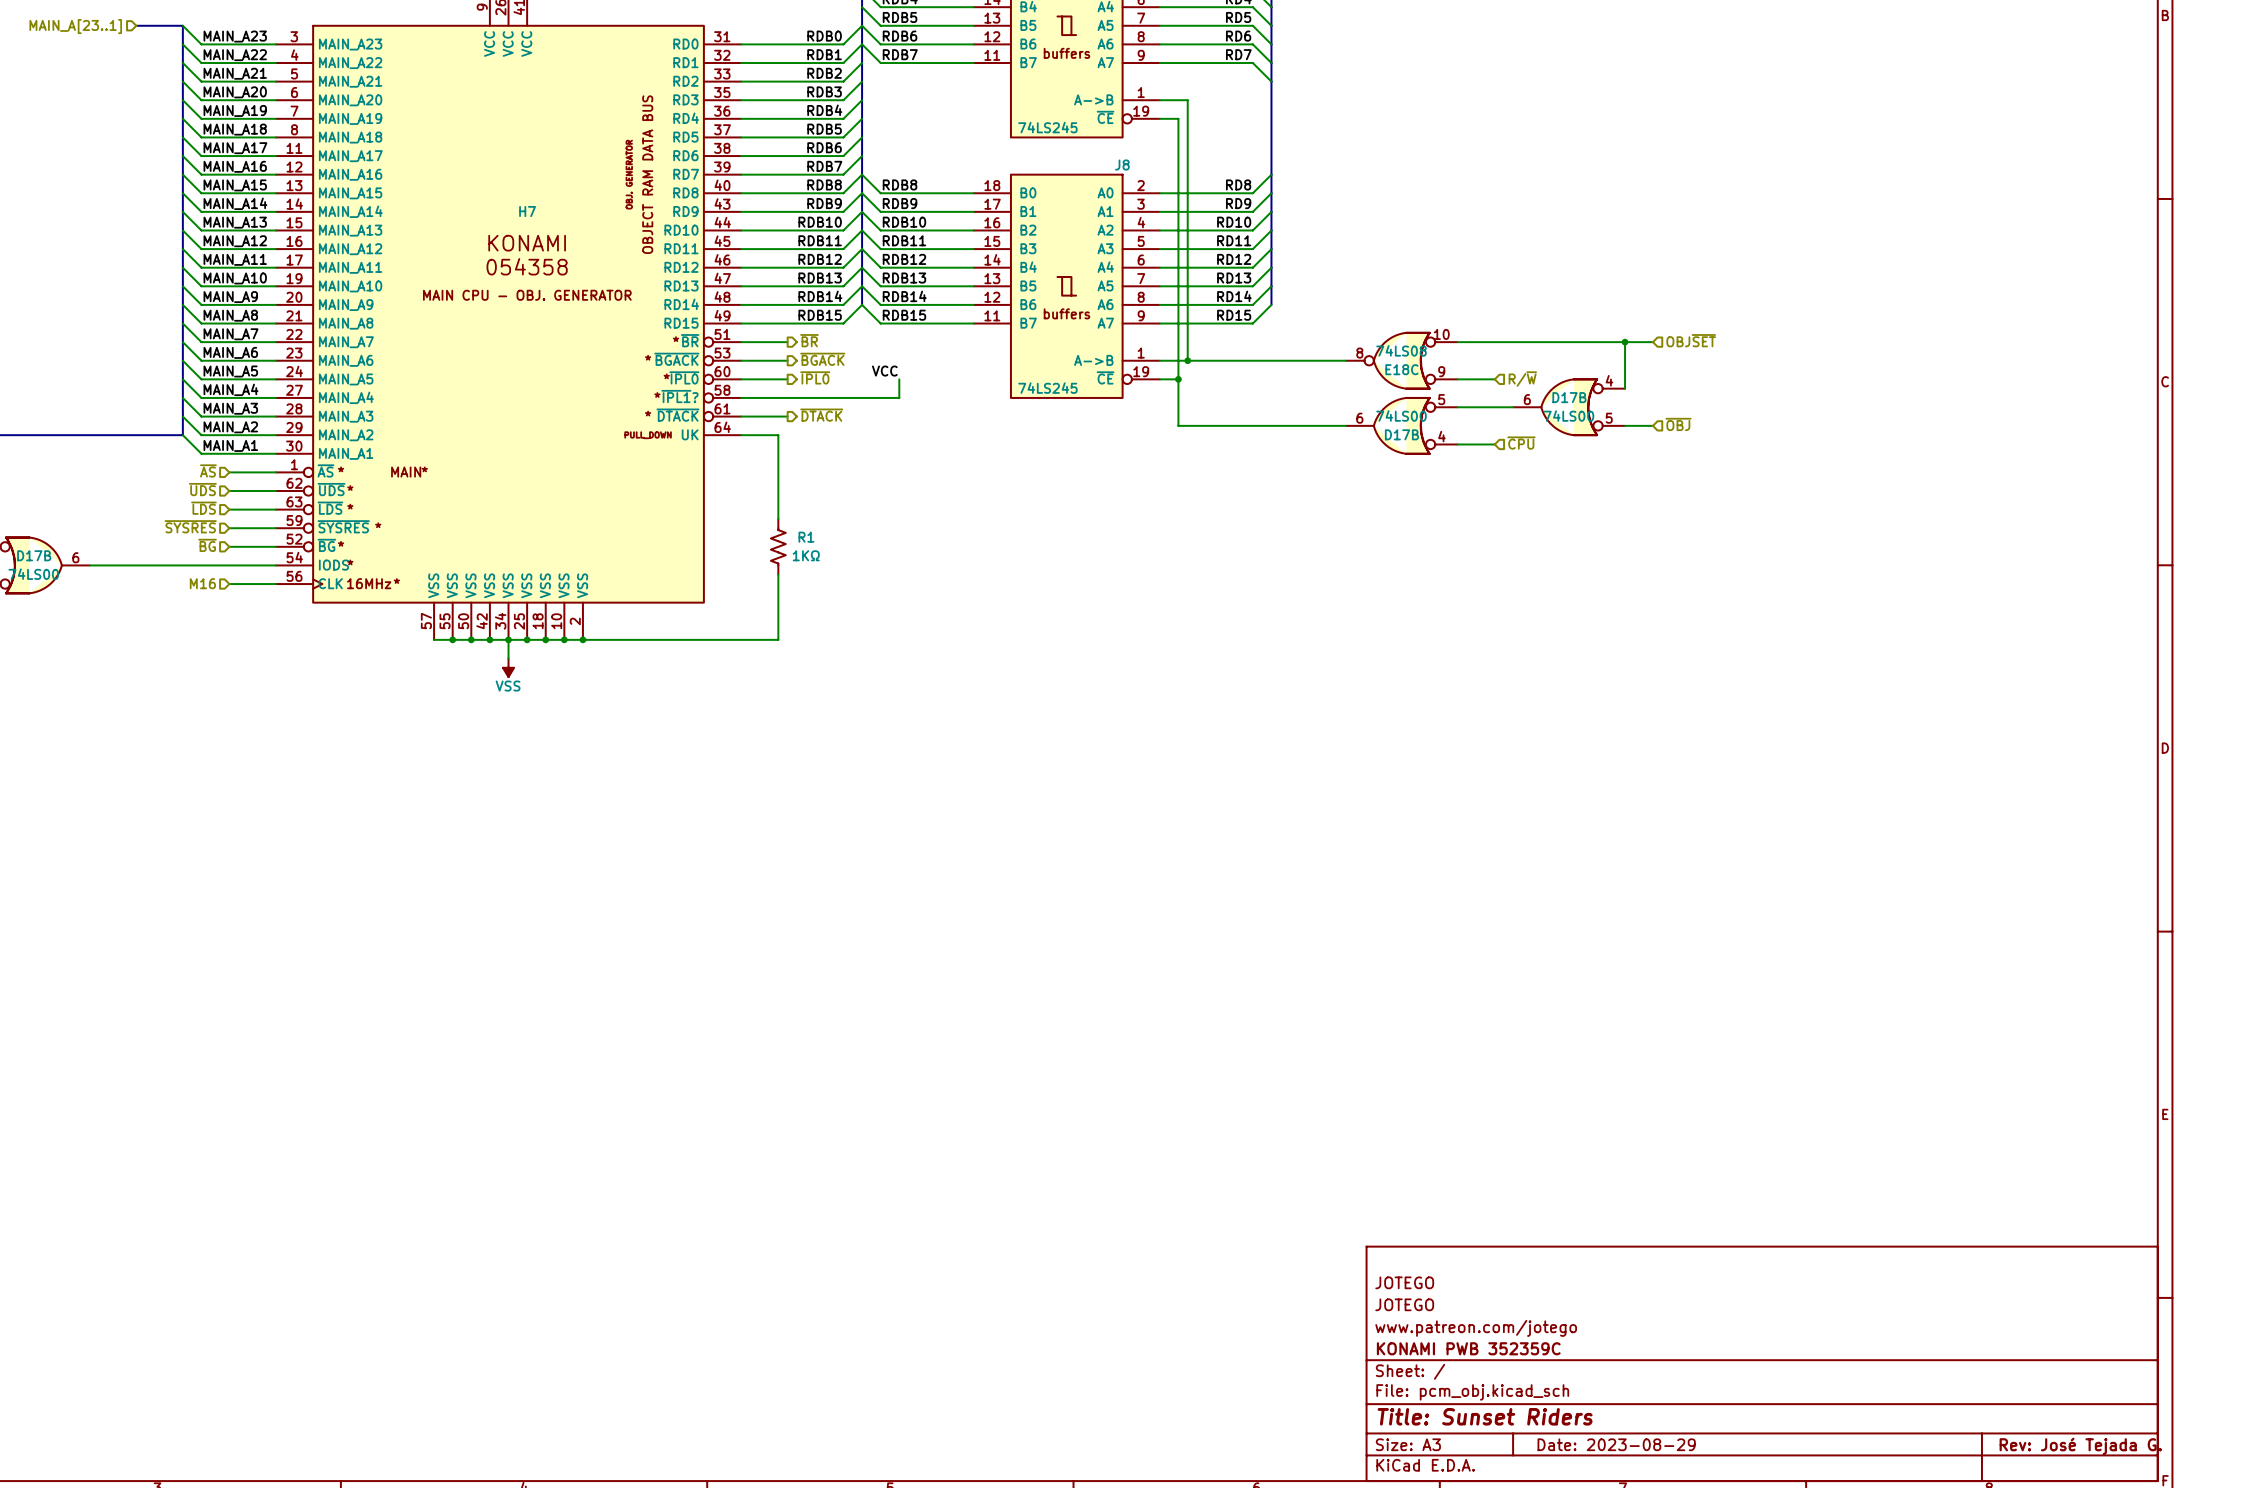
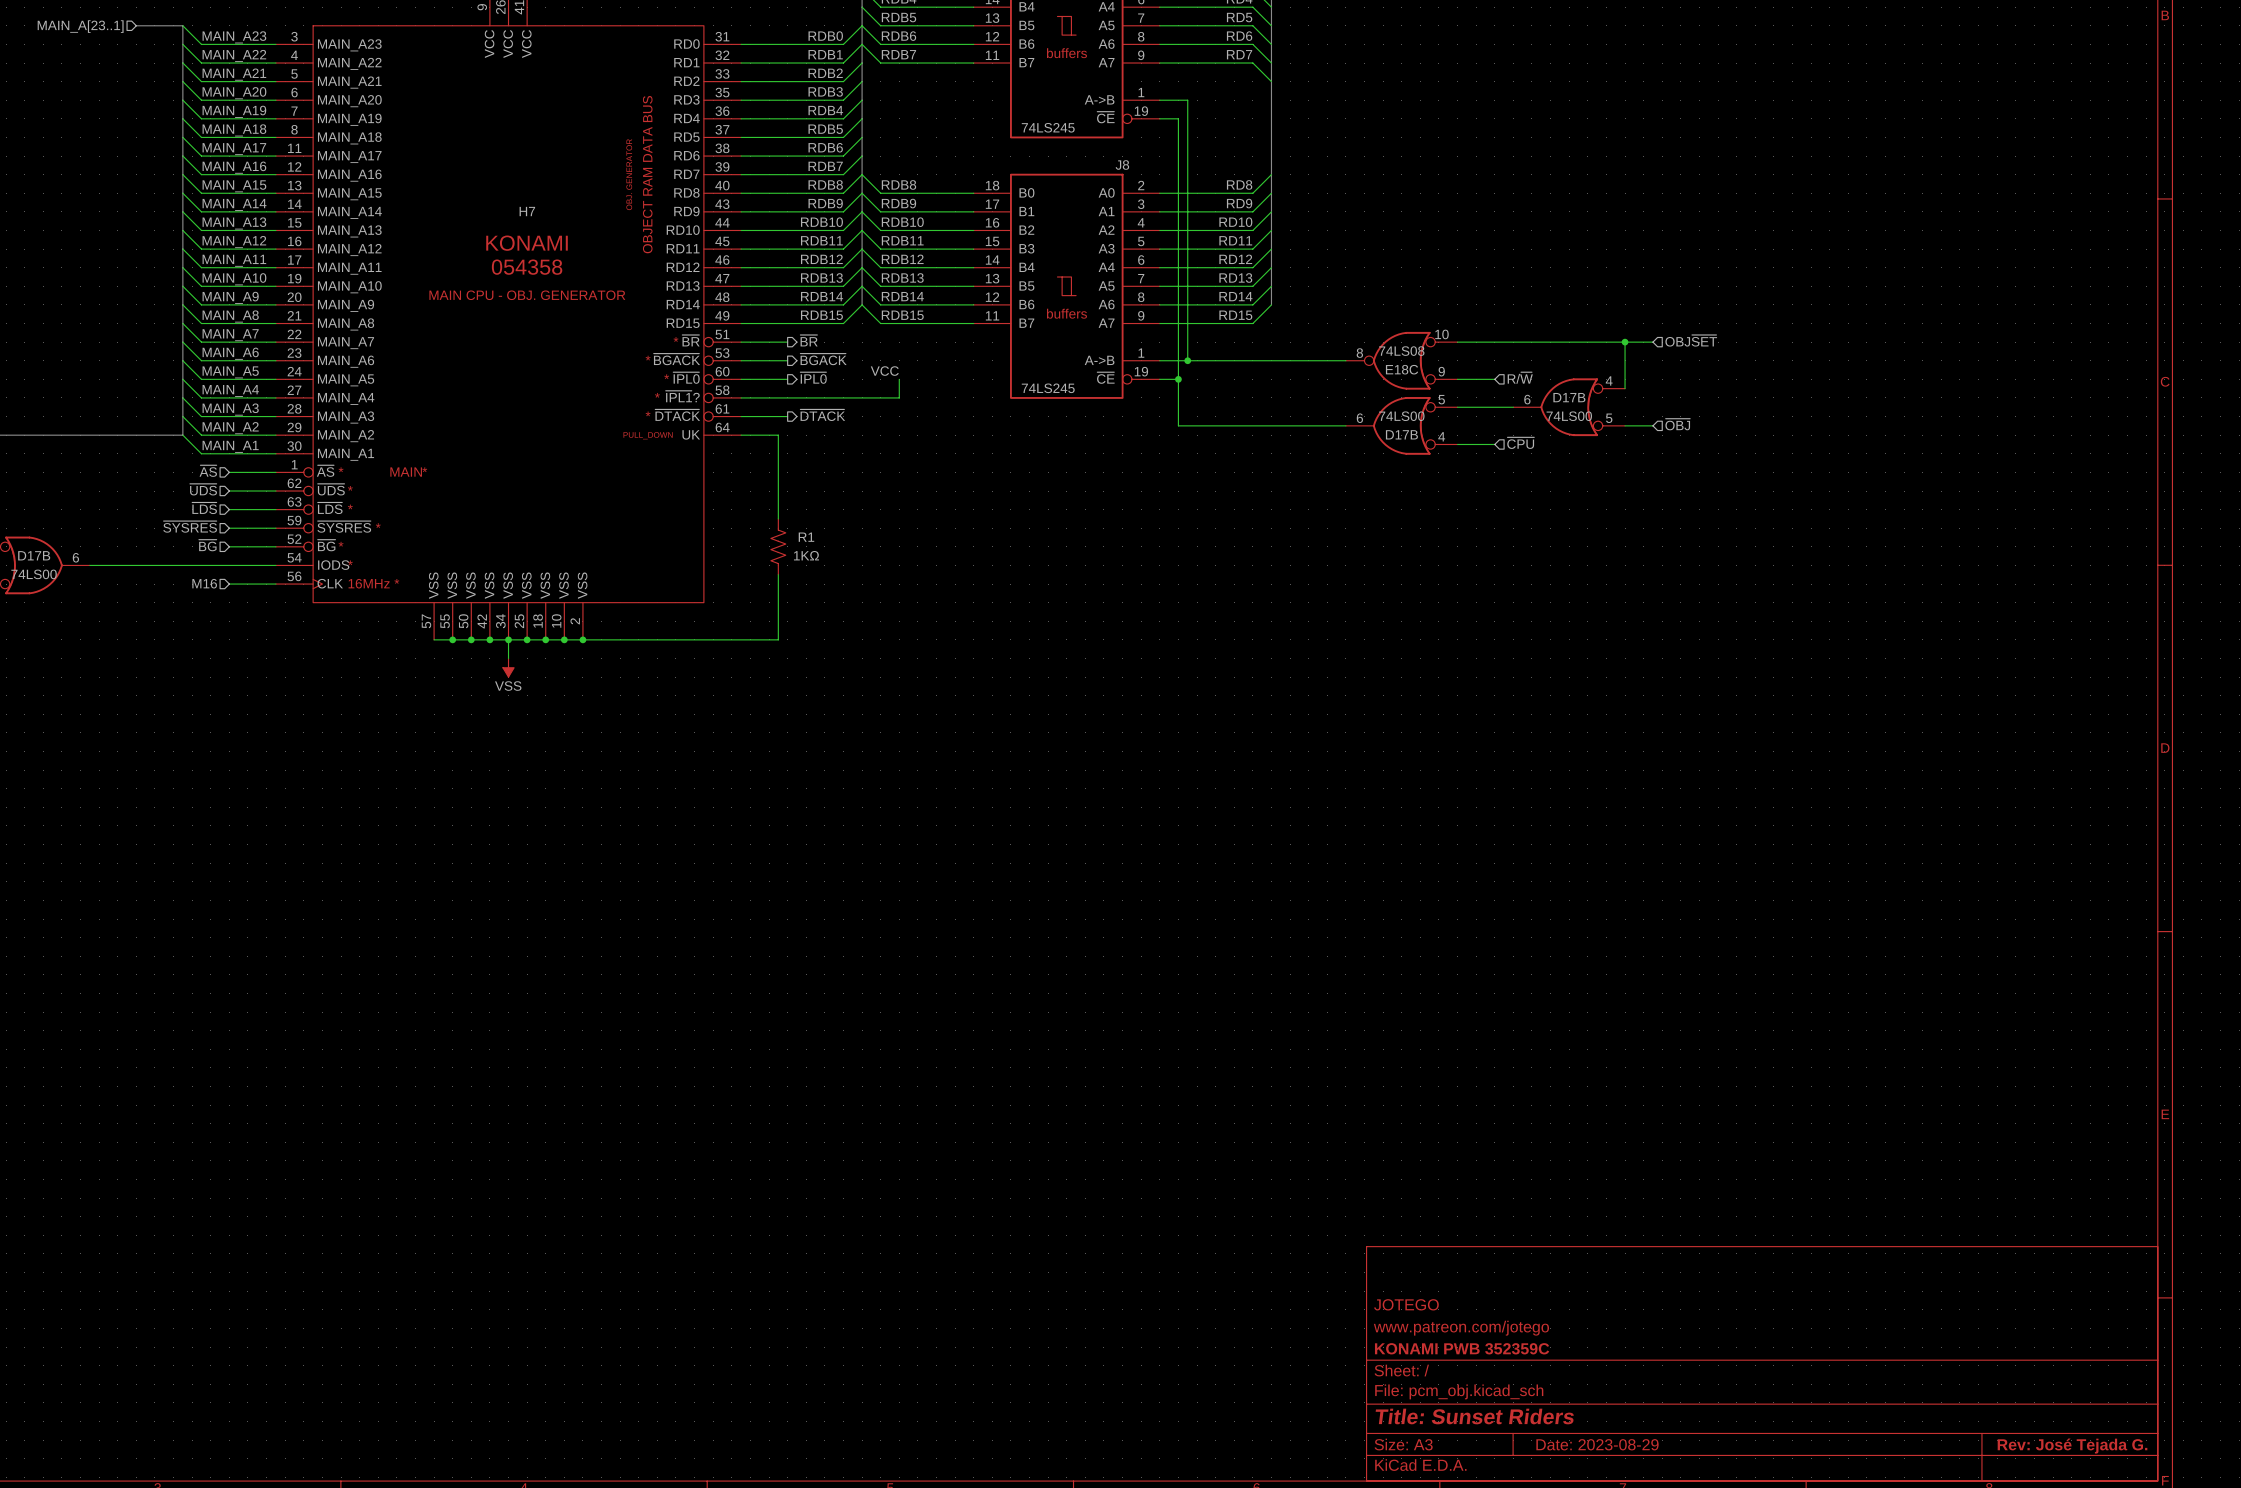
title block: JOTEGO (1404, 1282) -> none

